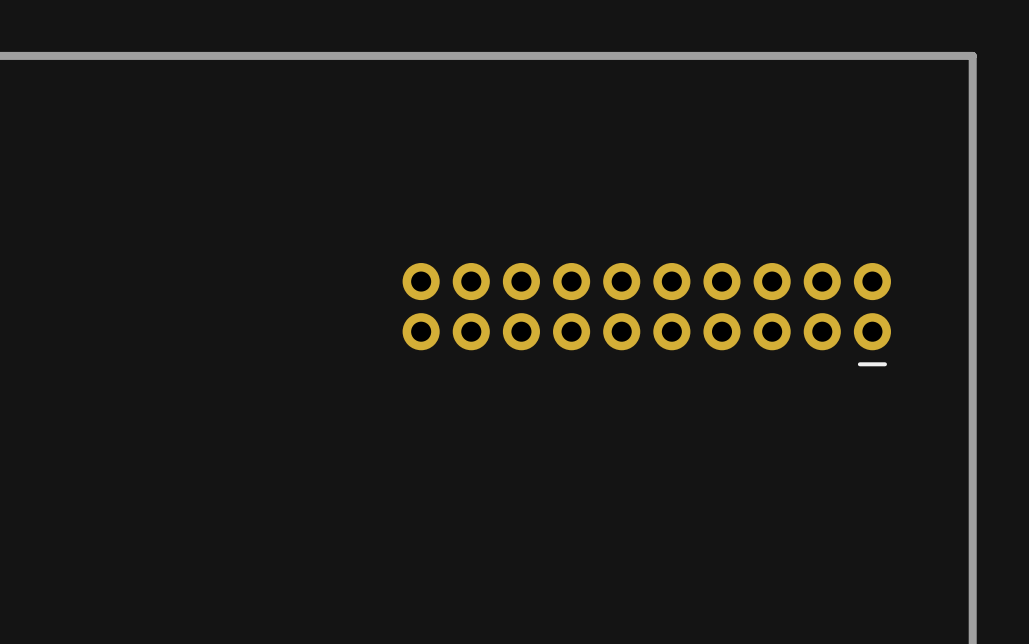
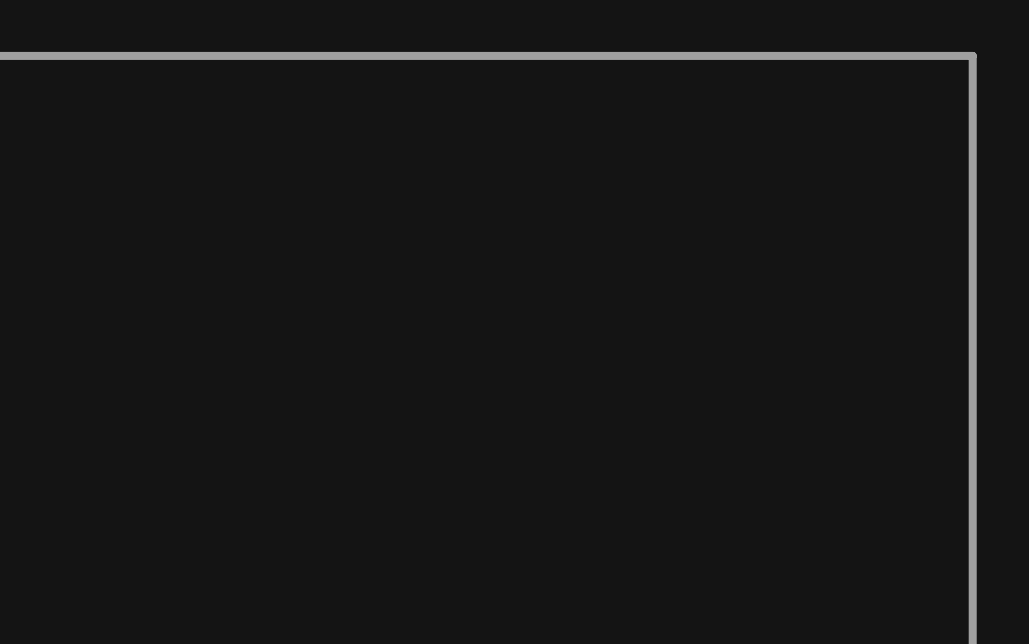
part: (646, 314) -> none

